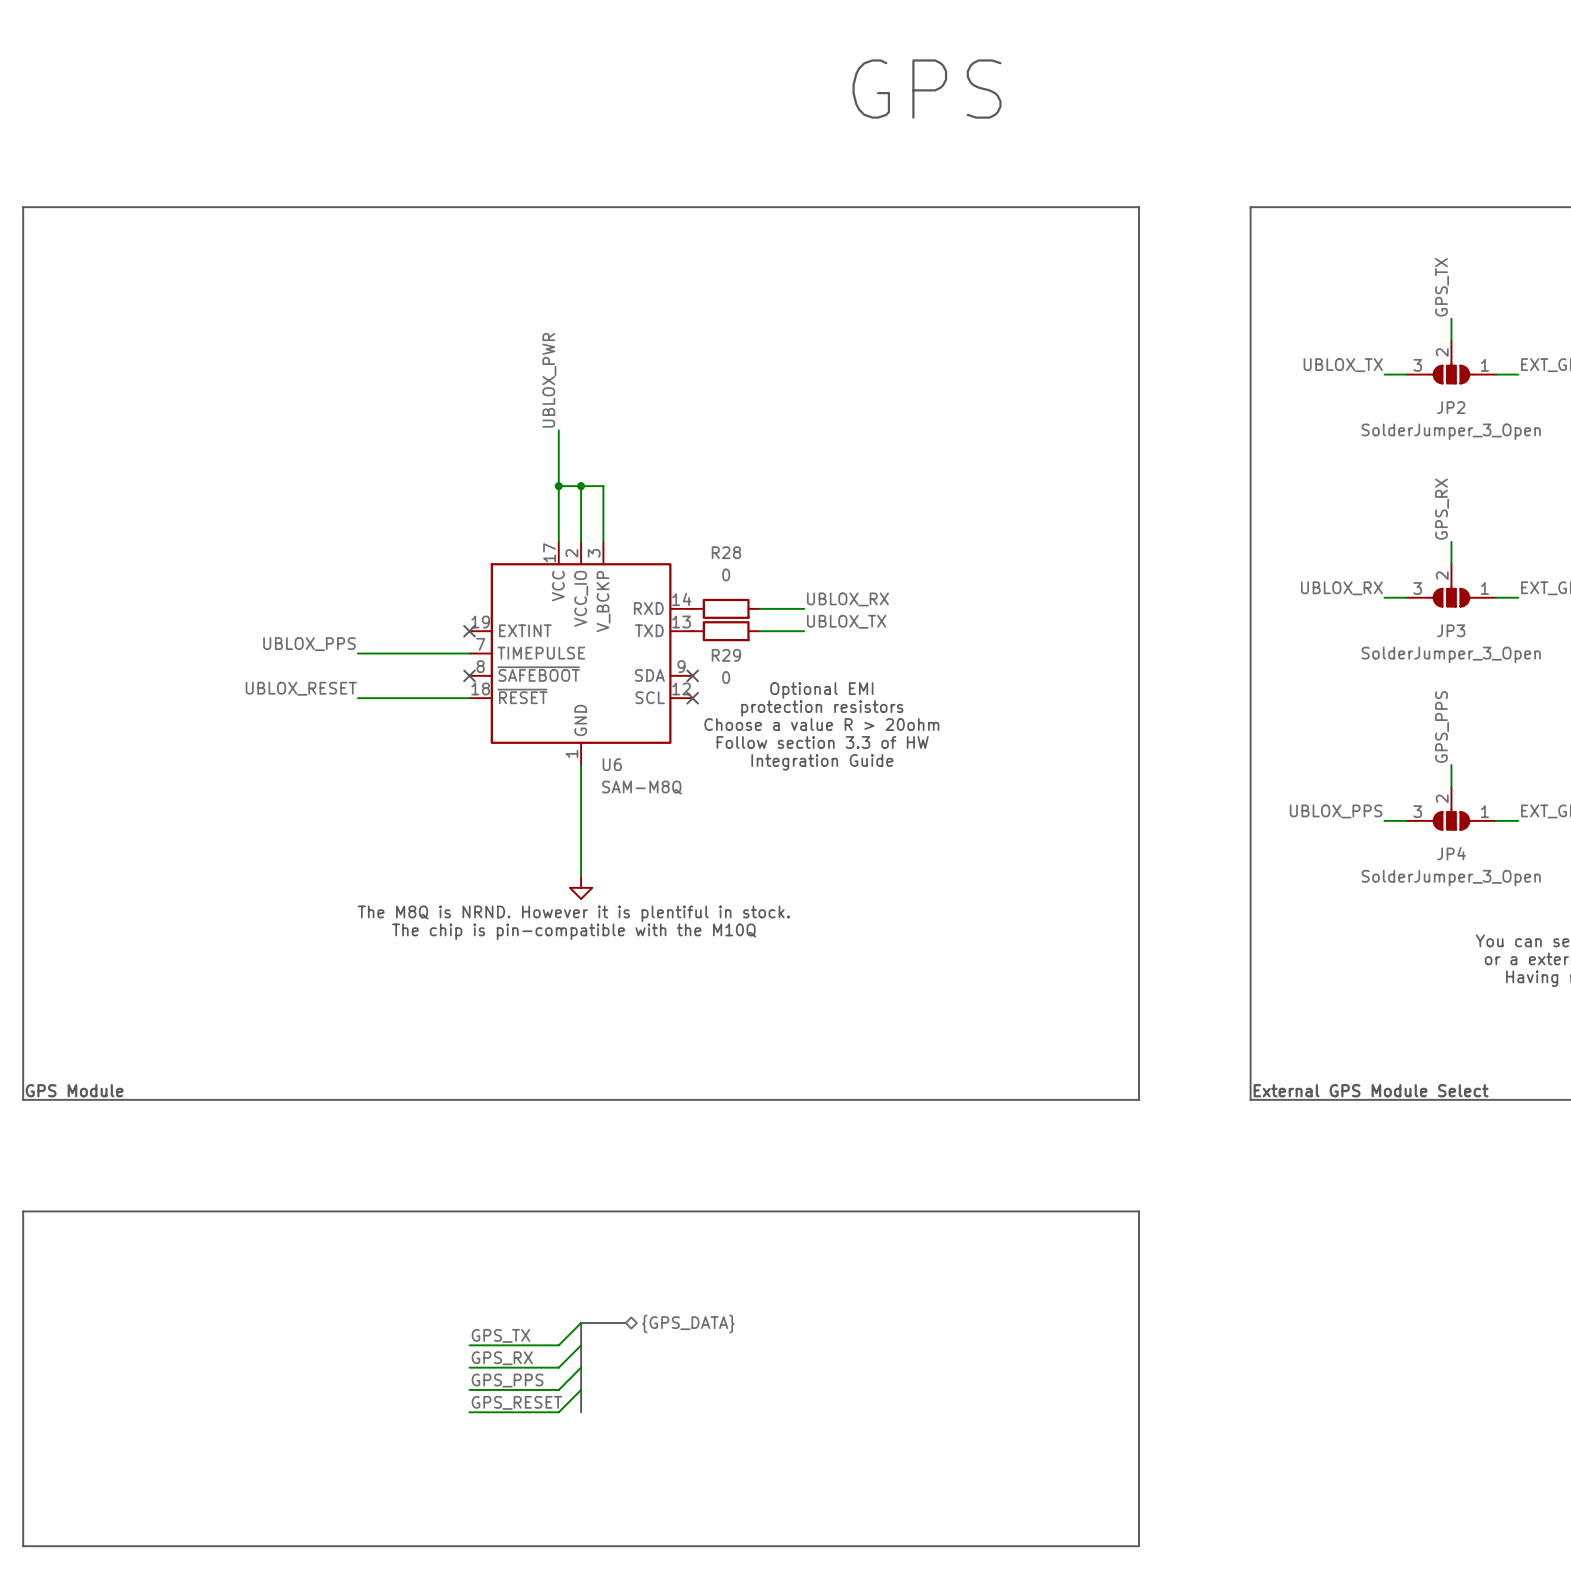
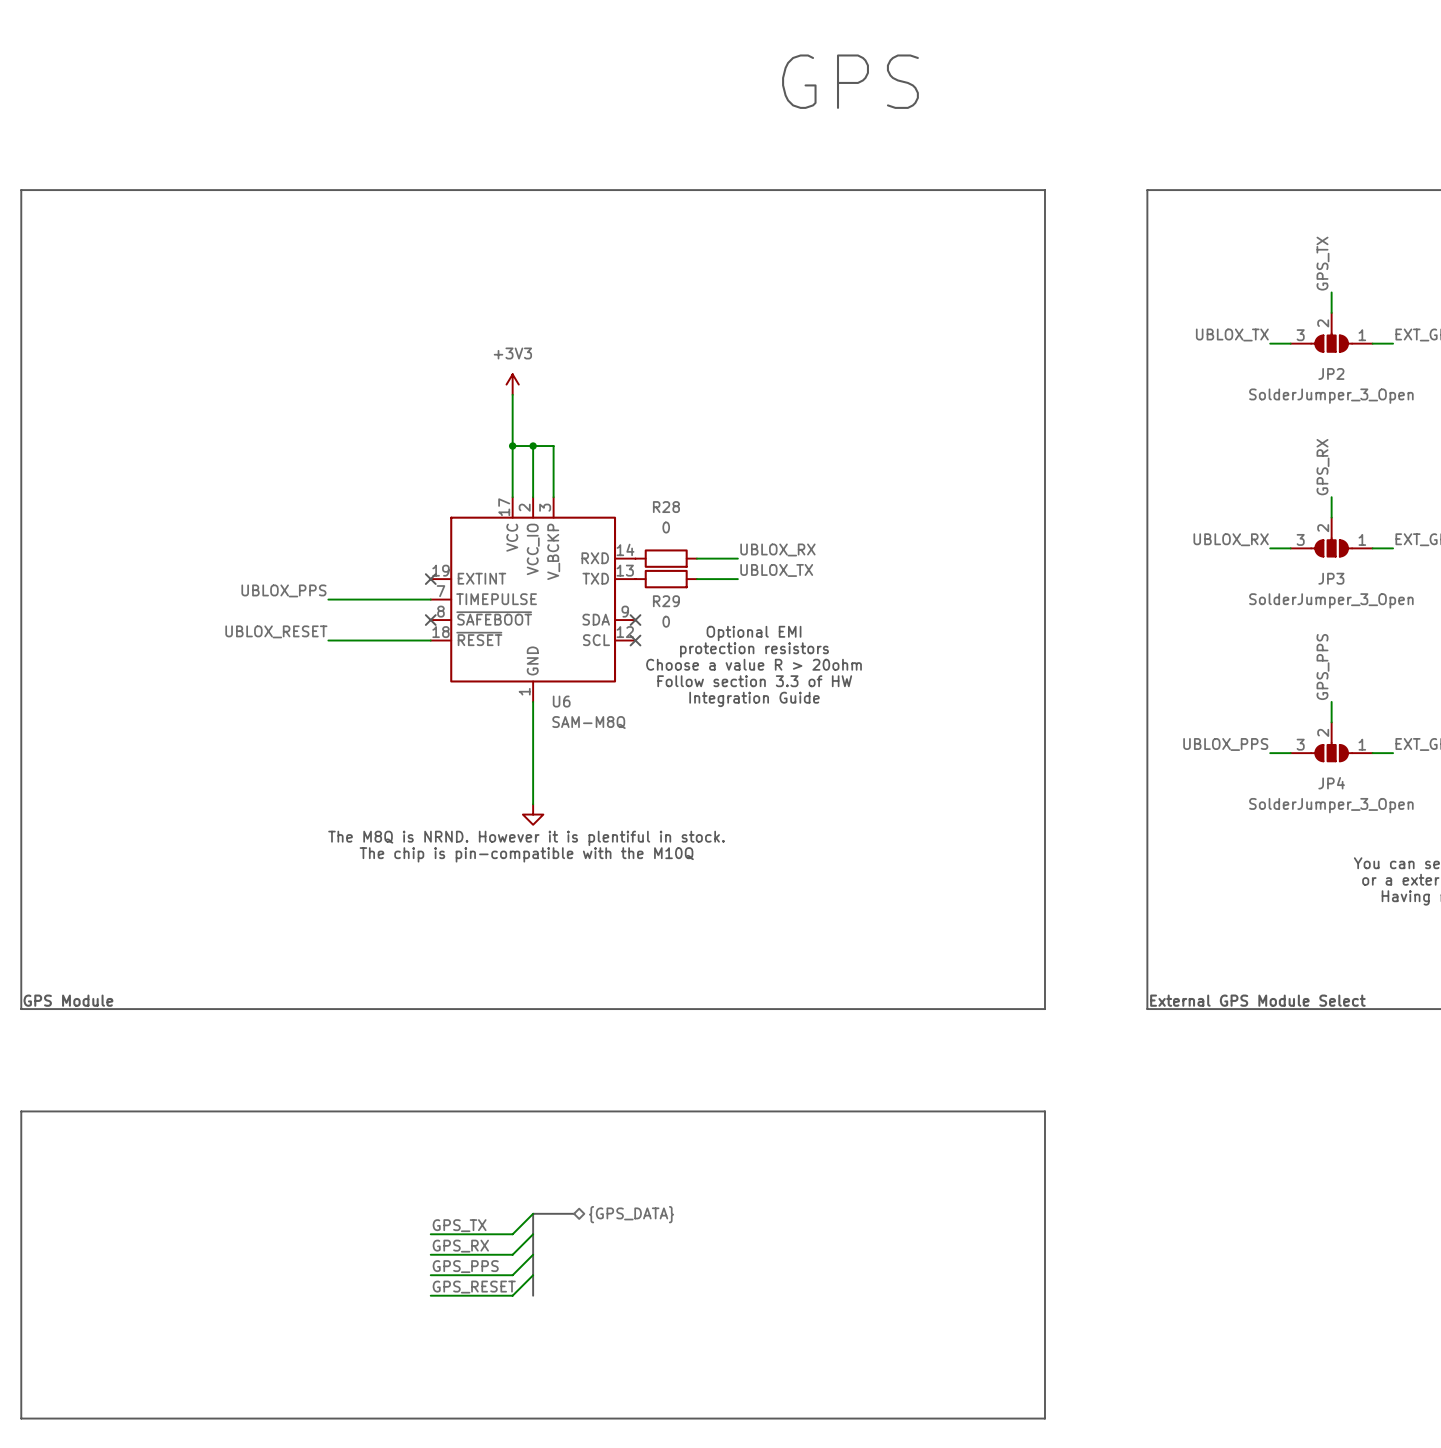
label: UBLOX_PWR (549, 380) -> none
power symbol: none -> +3V3 (512, 384)

